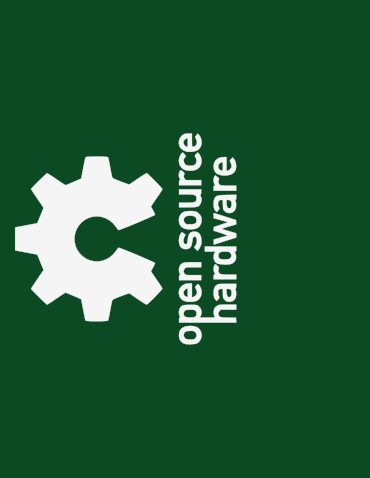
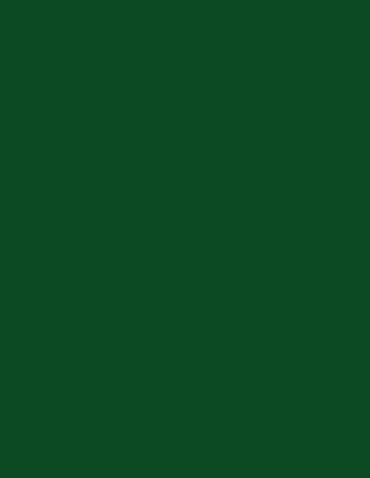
drawing: [14, 133, 237, 345] -> none

